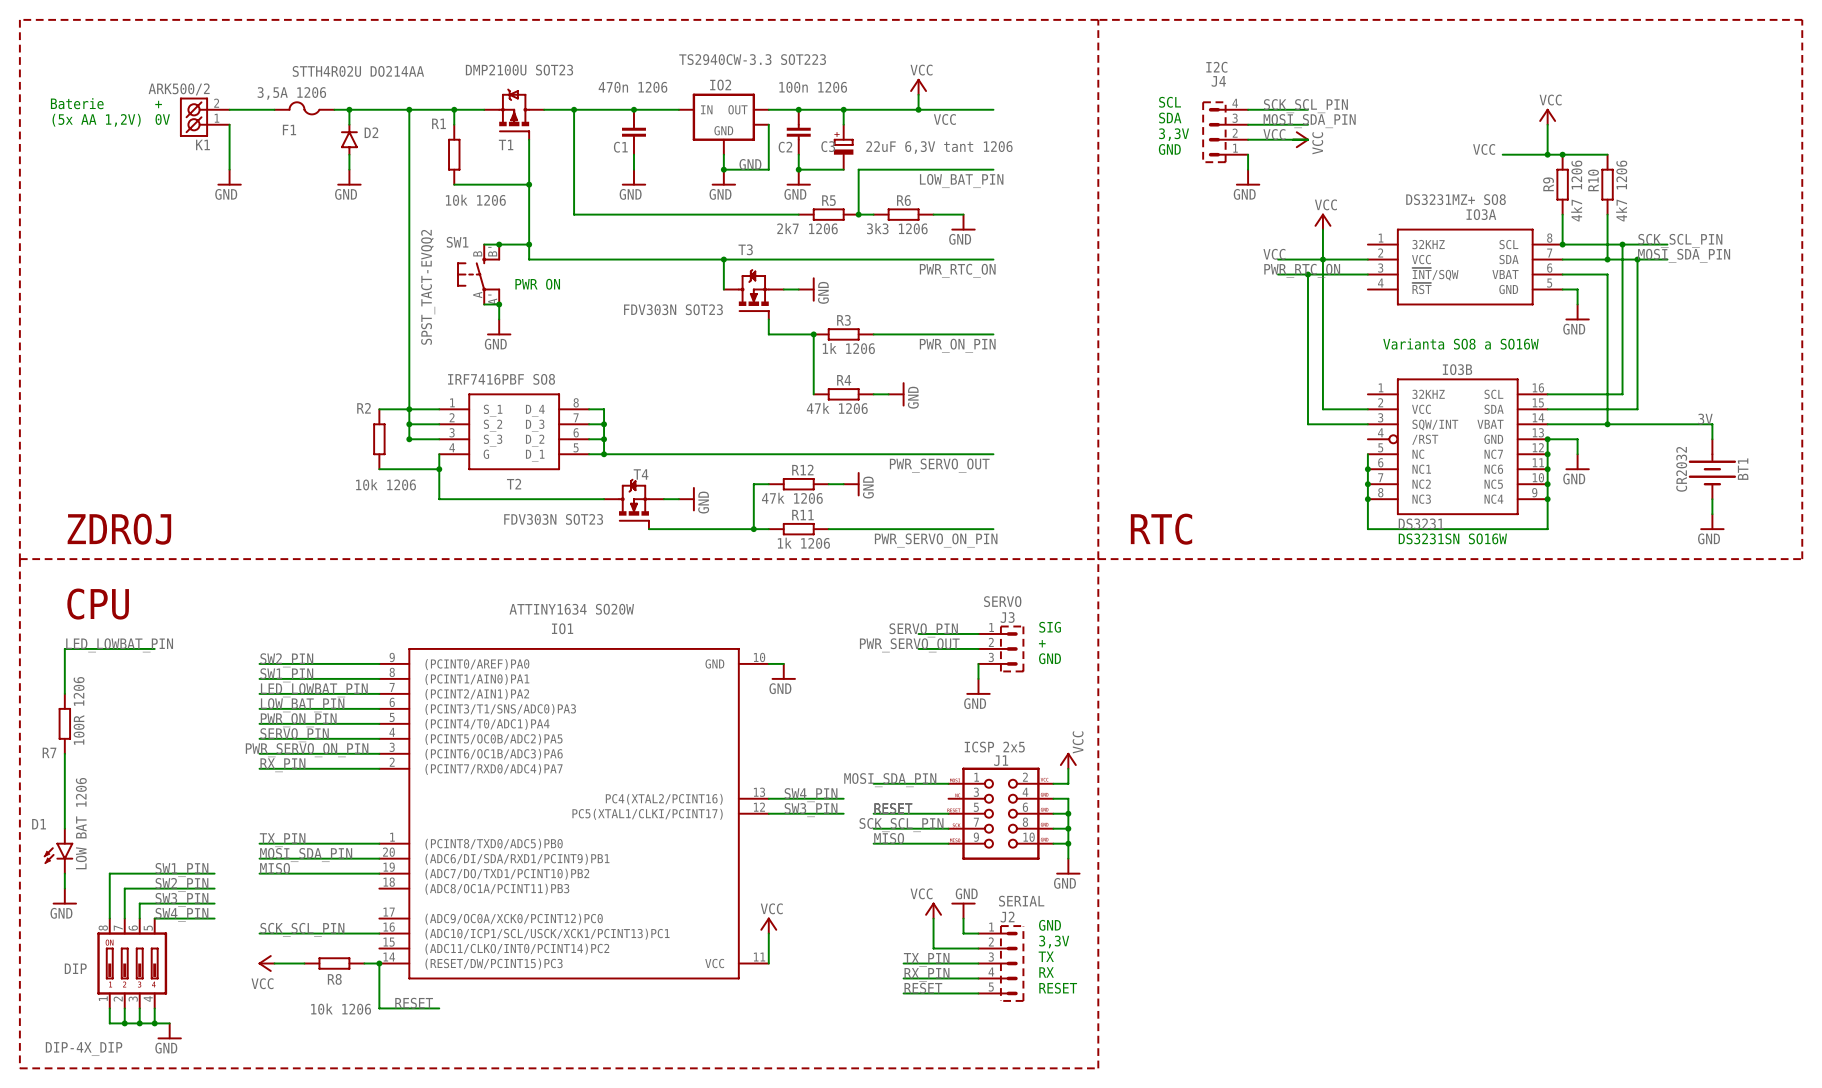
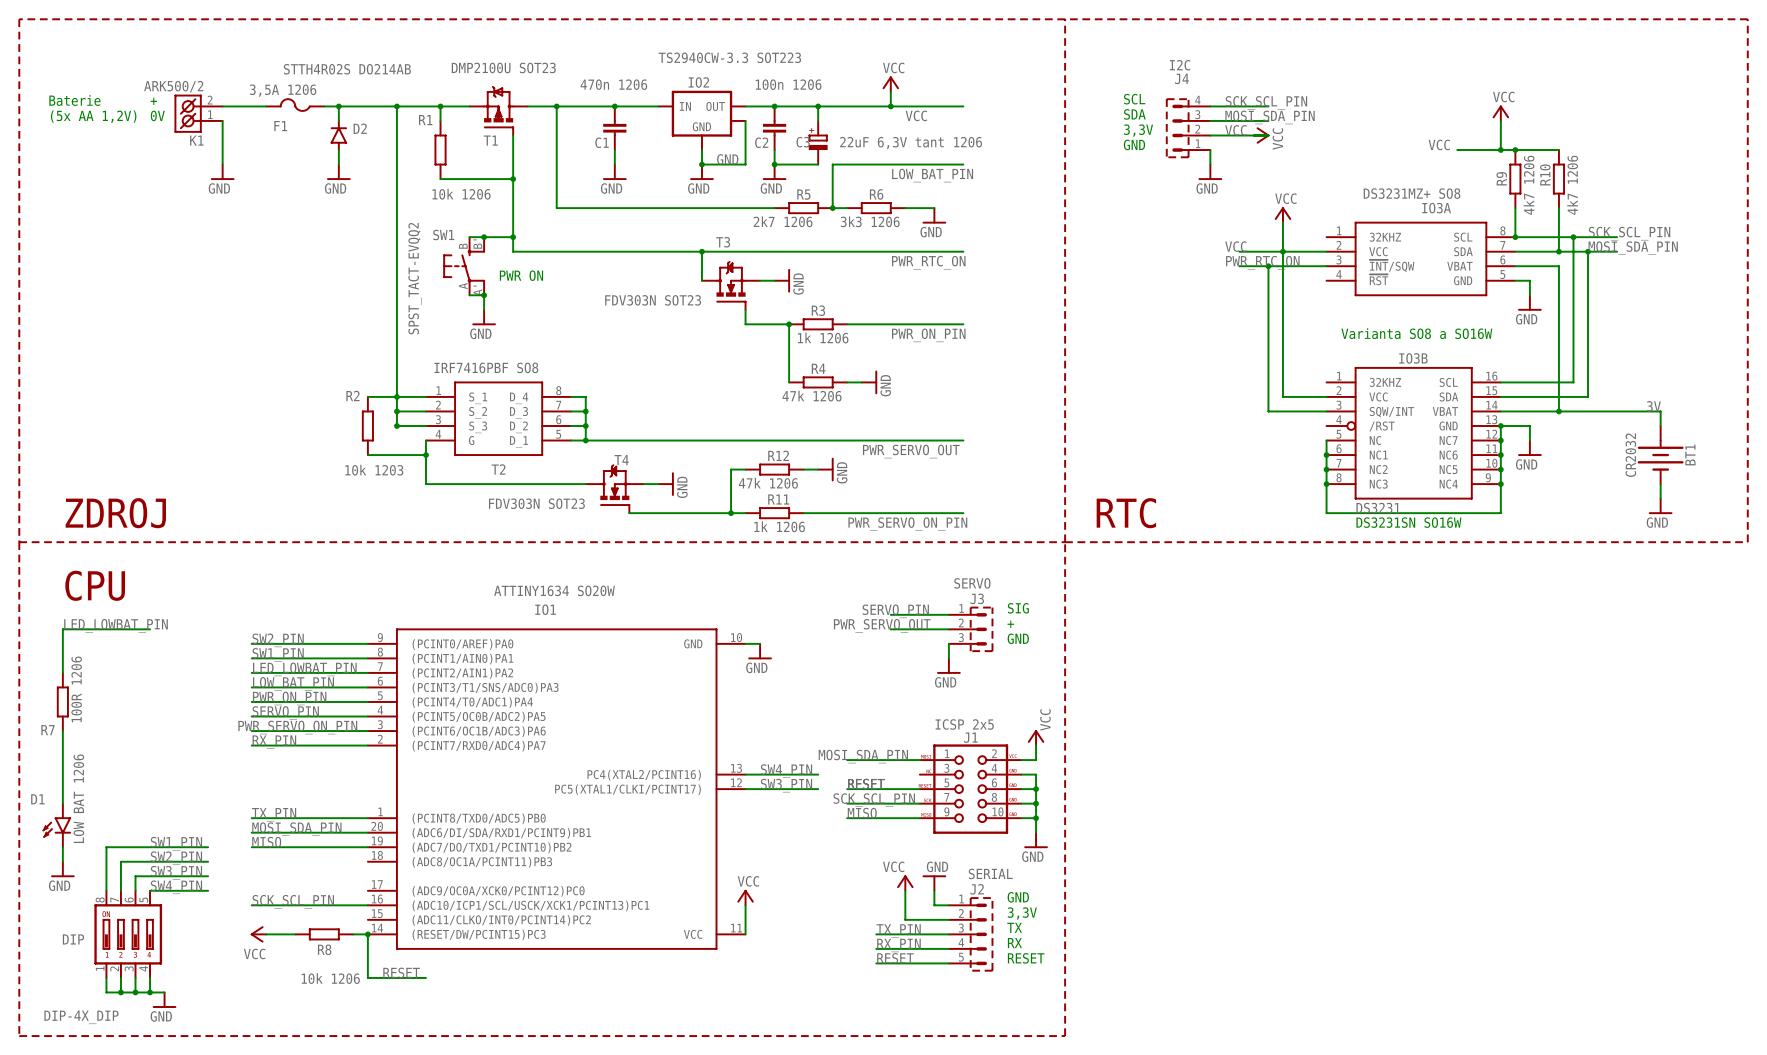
D2 value: STTH4R02U DO214AA (358, 71) -> STTH4R02S DO214AB (347, 69)
R2 value: 10k 1206 (386, 484) -> 10k 1203 (374, 470)

